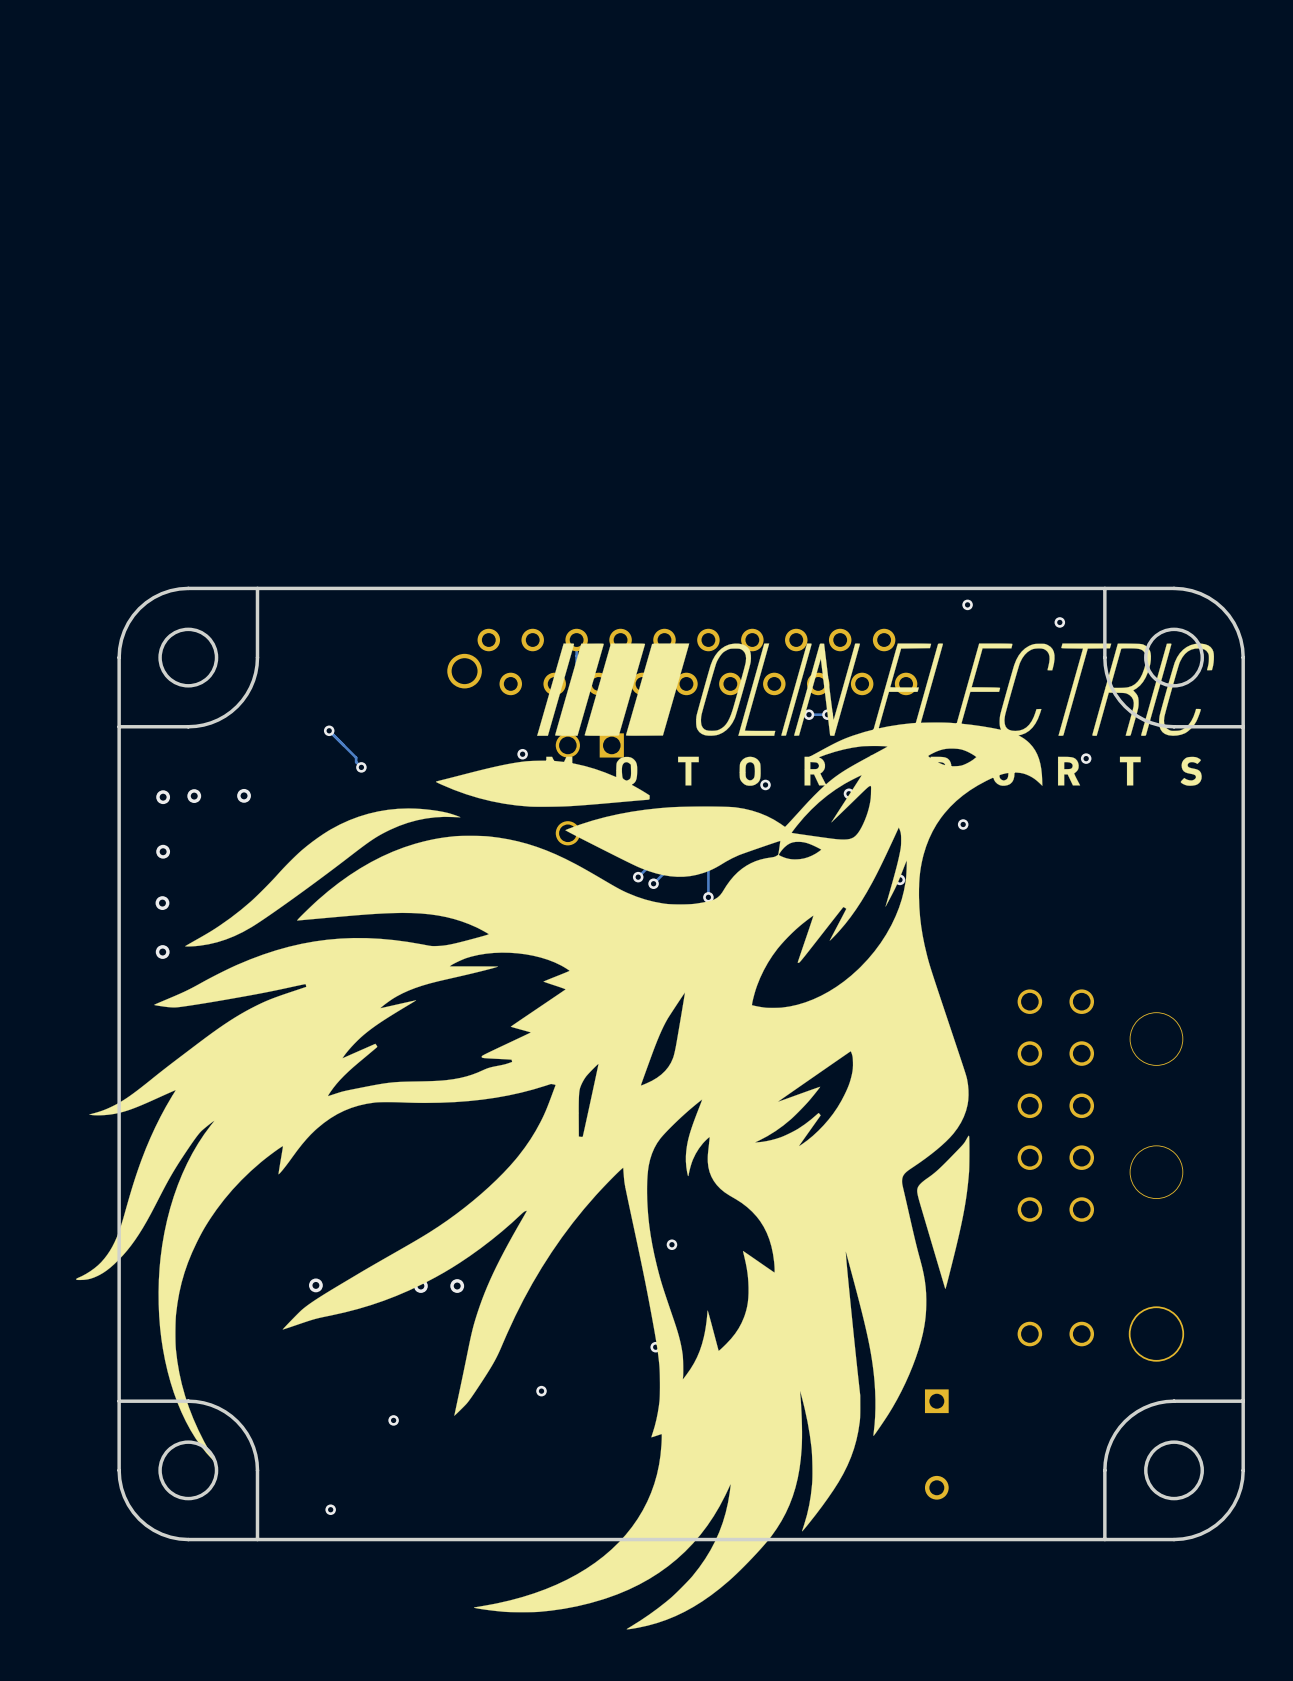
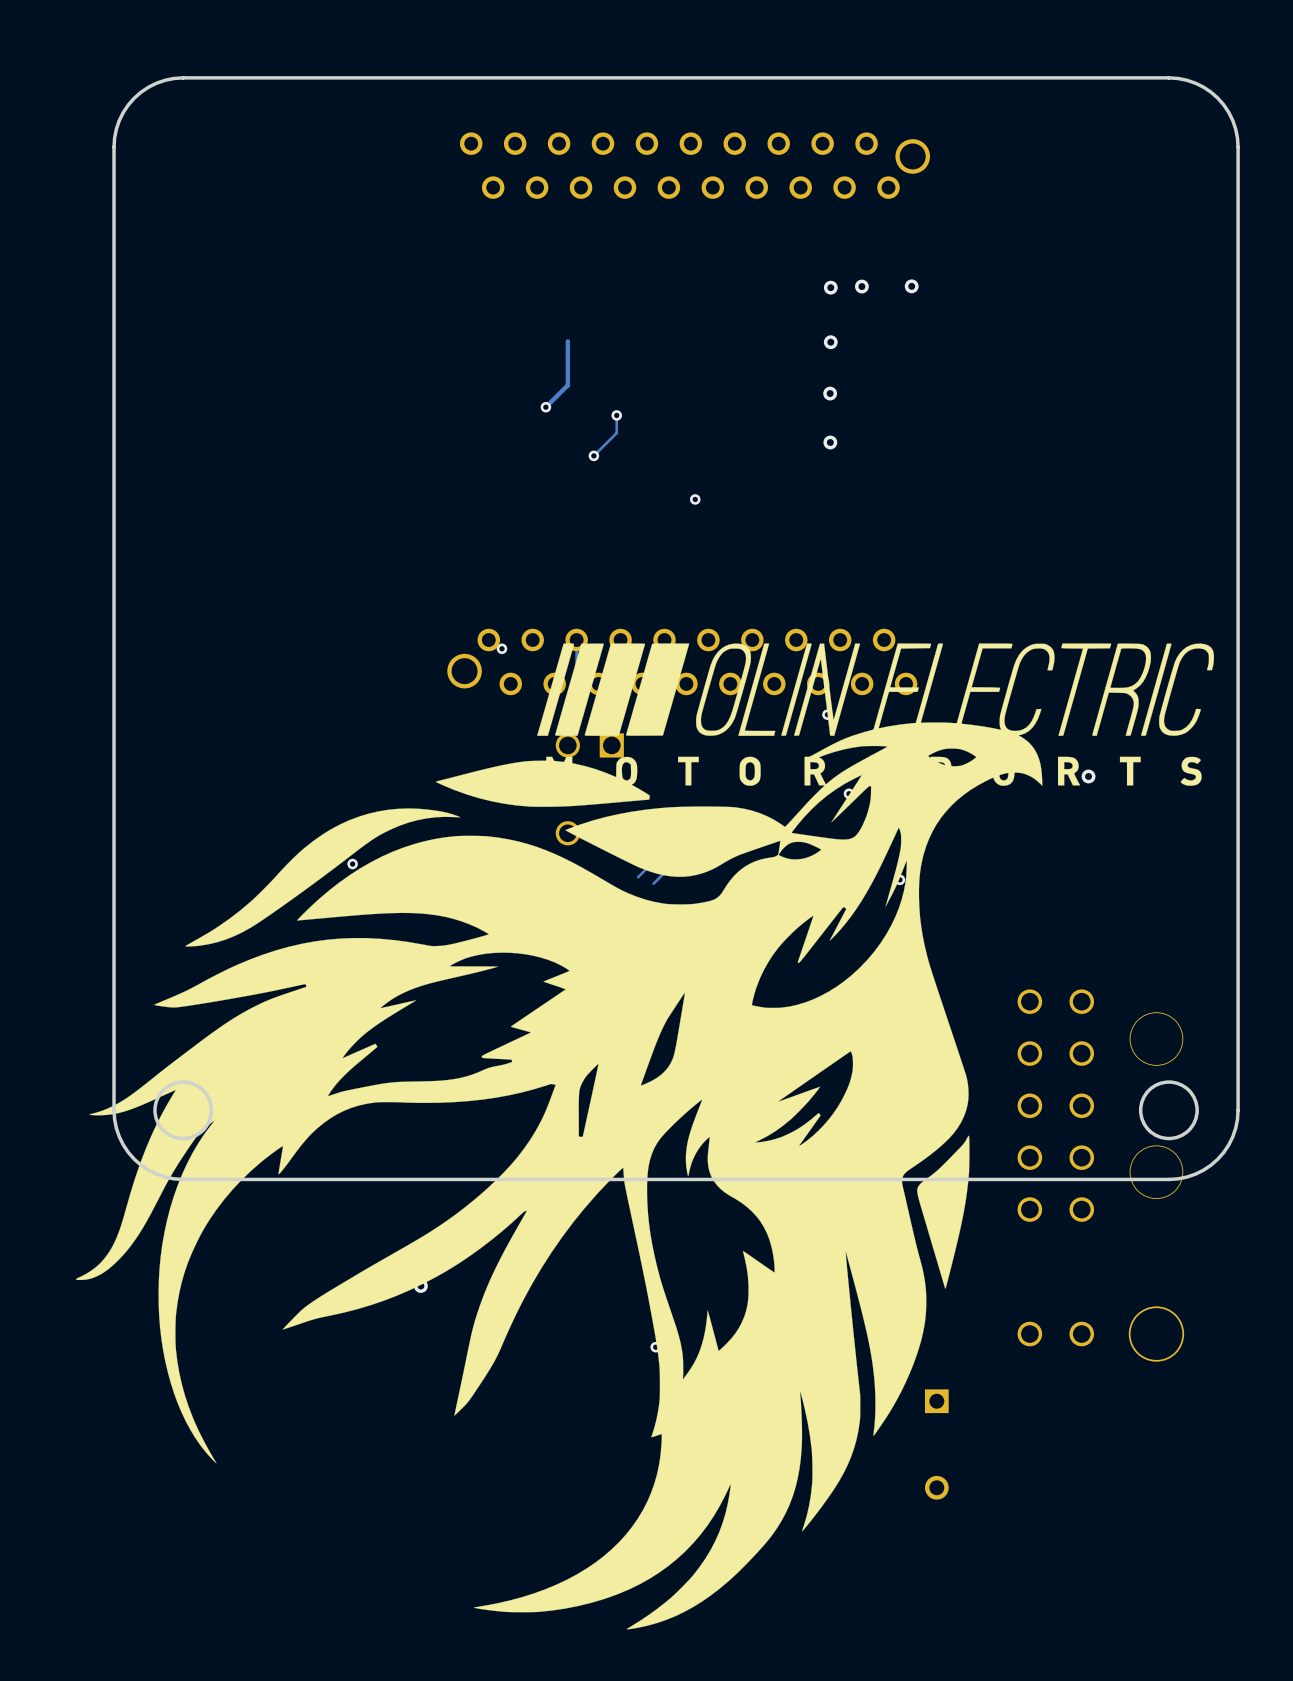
board edge: none -> (1168, 77) (183, 77) (156, 83) (134, 98) (119, 120) (114, 147) (114, 1110) (119, 1136) (134, 1159) (156, 1174) (183, 1179) (1168, 1179) (1195, 1174) (1217, 1159) (1232, 1136) (1238, 1110) (1238, 147) (1232, 120) (1217, 98) (1195, 83) (1168, 77)
part: none -> (695, 165)
via: none -> (861, 286)
via: none -> (911, 286)
via: none -> (830, 287)
track: none -> (567, 341) (567, 385) (545, 407)
via: none -> (830, 342)
via: none -> (830, 393)
via: none -> (545, 407)
track: none -> (616, 415) (616, 433) (593, 455)
via: none -> (616, 415)
via: none -> (830, 442)
via: none -> (593, 455)
via: none -> (695, 499)
board edge: (257, 588) (255, 672) (250, 687) (237, 706) (225, 716) (203, 725) (119, 726) -> none
board edge: (1104, 588) (1106, 672) (1115, 694) (1125, 706) (1137, 716) (1158, 725) (1243, 726) -> none
board edge: (1174, 588) (188, 588) (161, 593) (139, 608) (124, 631) (119, 657) (119, 1470) (124, 1496) (139, 1519) (161, 1534) (188, 1539) (1174, 1539) (1200, 1534) (1222, 1519) (1237, 1496) (1243, 1470) (1243, 657) (1237, 631) (1222, 608) (1200, 593) (1174, 588) -> none
via: (967, 604) -> none
via: (1059, 622) -> none
round board edge: [158, 627, 219, 688] -> none
round board edge: [1144, 627, 1204, 688] -> none
via: none -> (501, 648)
via: (809, 714) -> none
track: (827, 714) (809, 714) -> none
track: (329, 730) (356, 757) (356, 762) (361, 767) -> none
via: (329, 730) -> none
via: (522, 754) -> none
via: (1086, 758) -> none
via: (361, 767) -> none
via: none -> (1088, 776)
via: (765, 784) -> none
via: (244, 795) -> none
via: (194, 796) -> none
via: (163, 797) -> none
via: (963, 824) -> none
track: (708, 850) (708, 897) -> none
via: (163, 851) -> none
via: none -> (352, 864)
via: (638, 877) -> none
via: (653, 883) -> none
via: (708, 897) -> none
via: (162, 903) -> none
via: (162, 952) -> none
round board edge: none -> [153, 1080, 214, 1141]
round board edge: none -> [1138, 1080, 1199, 1141]
via: (671, 1244) -> none
via: (315, 1285) -> none
via: (457, 1286) -> none
via: (541, 1391) -> none
board edge: (119, 1401) (203, 1402) (218, 1408) (237, 1421) (246, 1433) (255, 1454) (257, 1539) -> none
board edge: (1243, 1401) (1158, 1402) (1137, 1411) (1125, 1421) (1115, 1433) (1106, 1454) (1104, 1539) -> none
via: (393, 1420) -> none
round board edge: [158, 1440, 219, 1501] -> none
round board edge: [1144, 1440, 1204, 1501] -> none
via: (330, 1509) -> none

